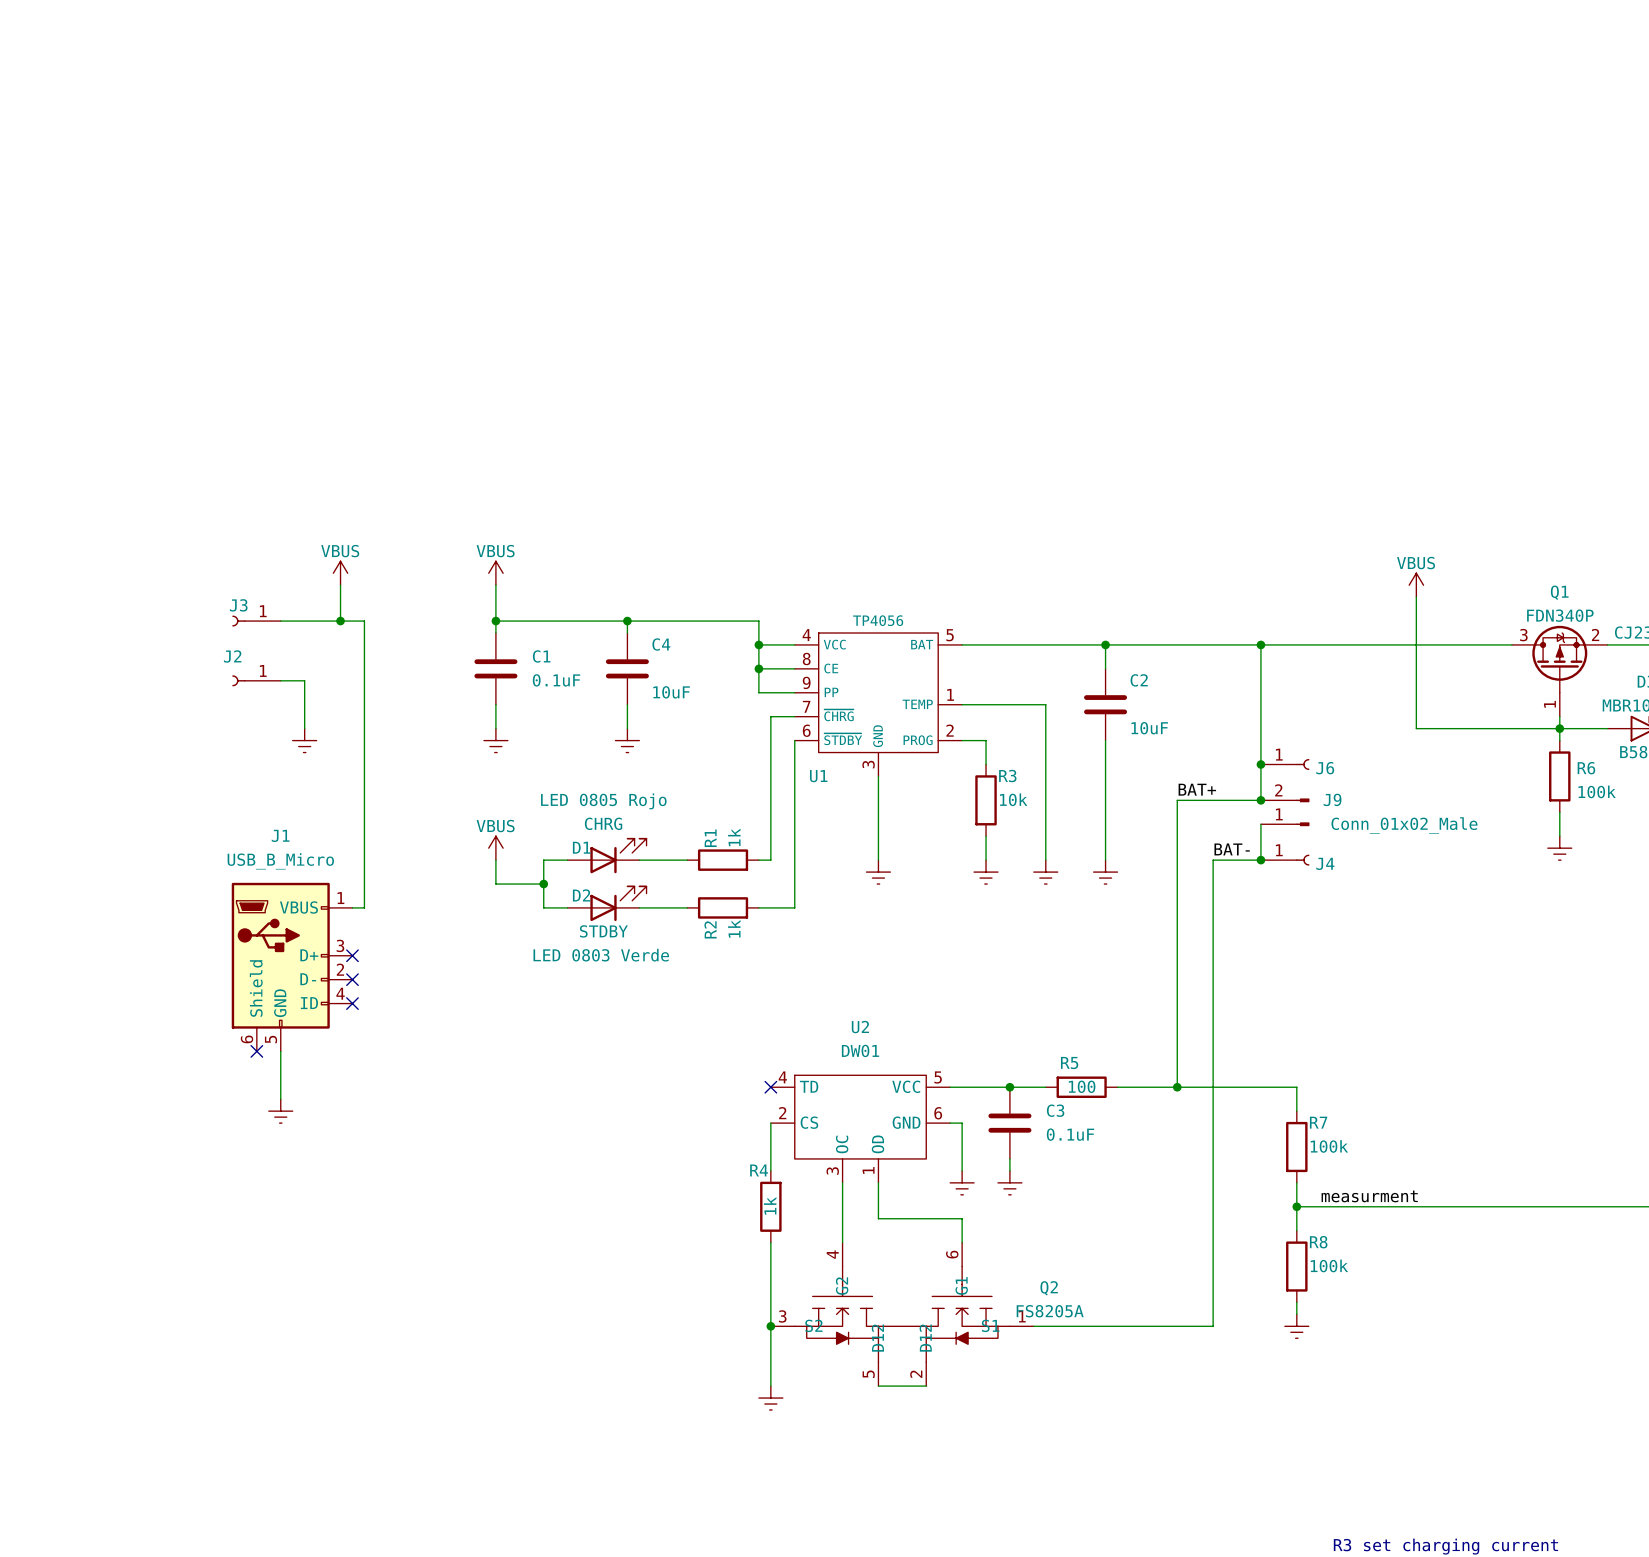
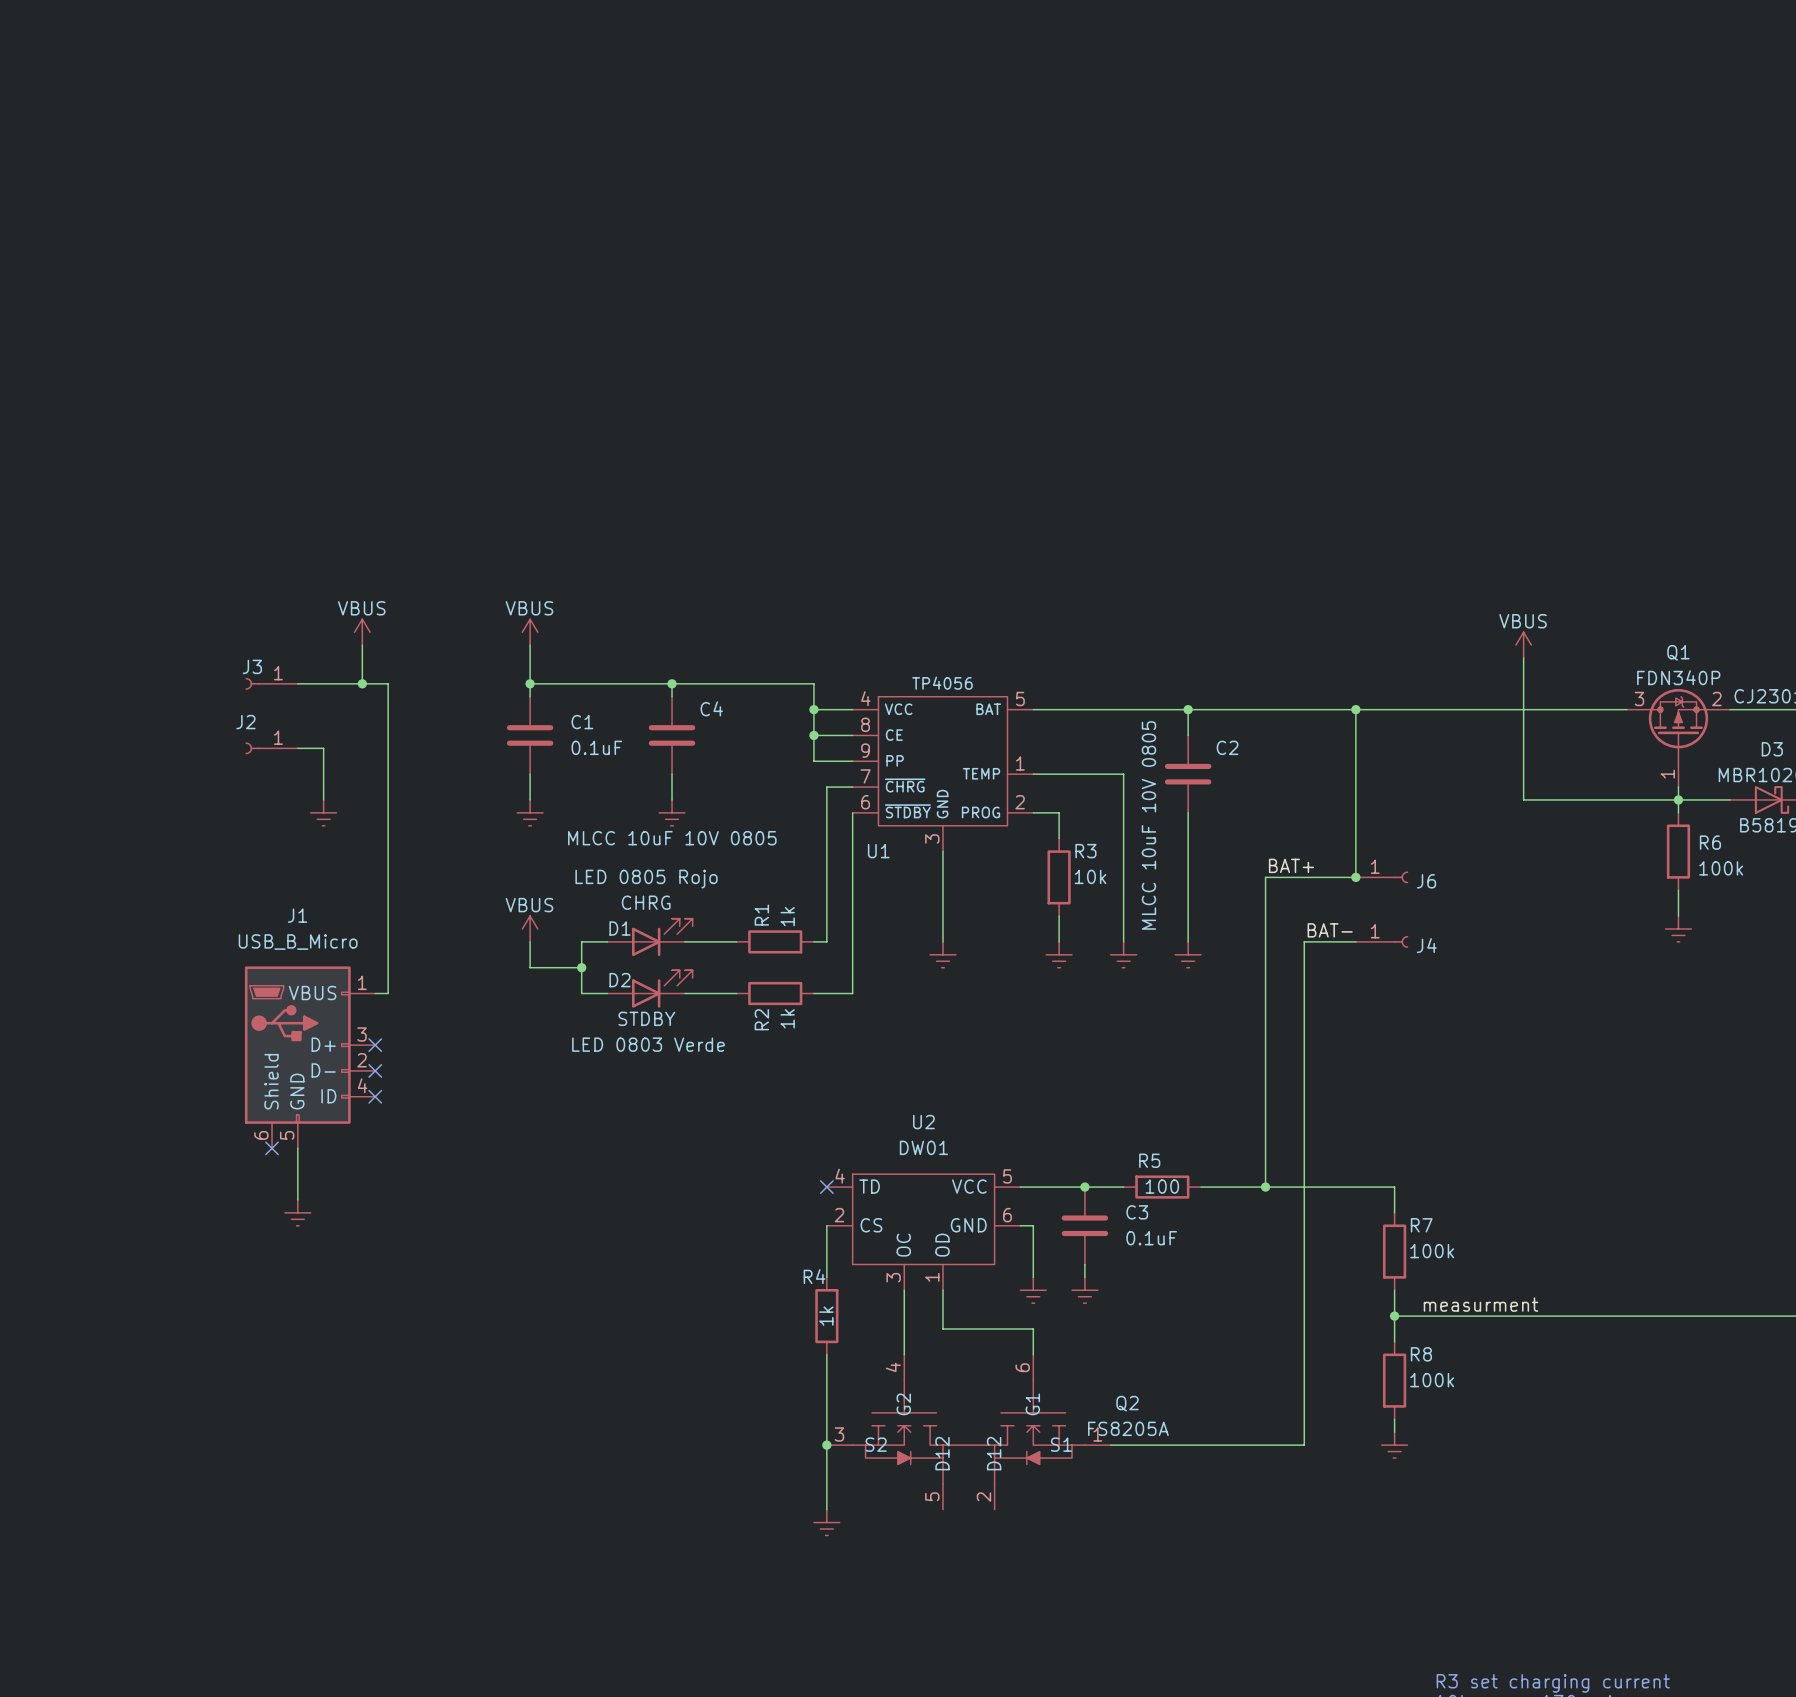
C4 value: 10uF (671, 692) -> MLCC 10uF 10V 0805 (672, 838)
C2 value: 10uF (1149, 728) -> MLCC 10uF 10V 0805 (1148, 825)
junction: (1260, 764) -> none
J6 position: (1285, 764) -> (1382, 877)
J9: Conn_01x02_Male (1285, 812) -> none
wire: (1260, 824) (1260, 860) -> none
junction: (1260, 860) -> none
wire: (878, 1386) (926, 1386) -> none

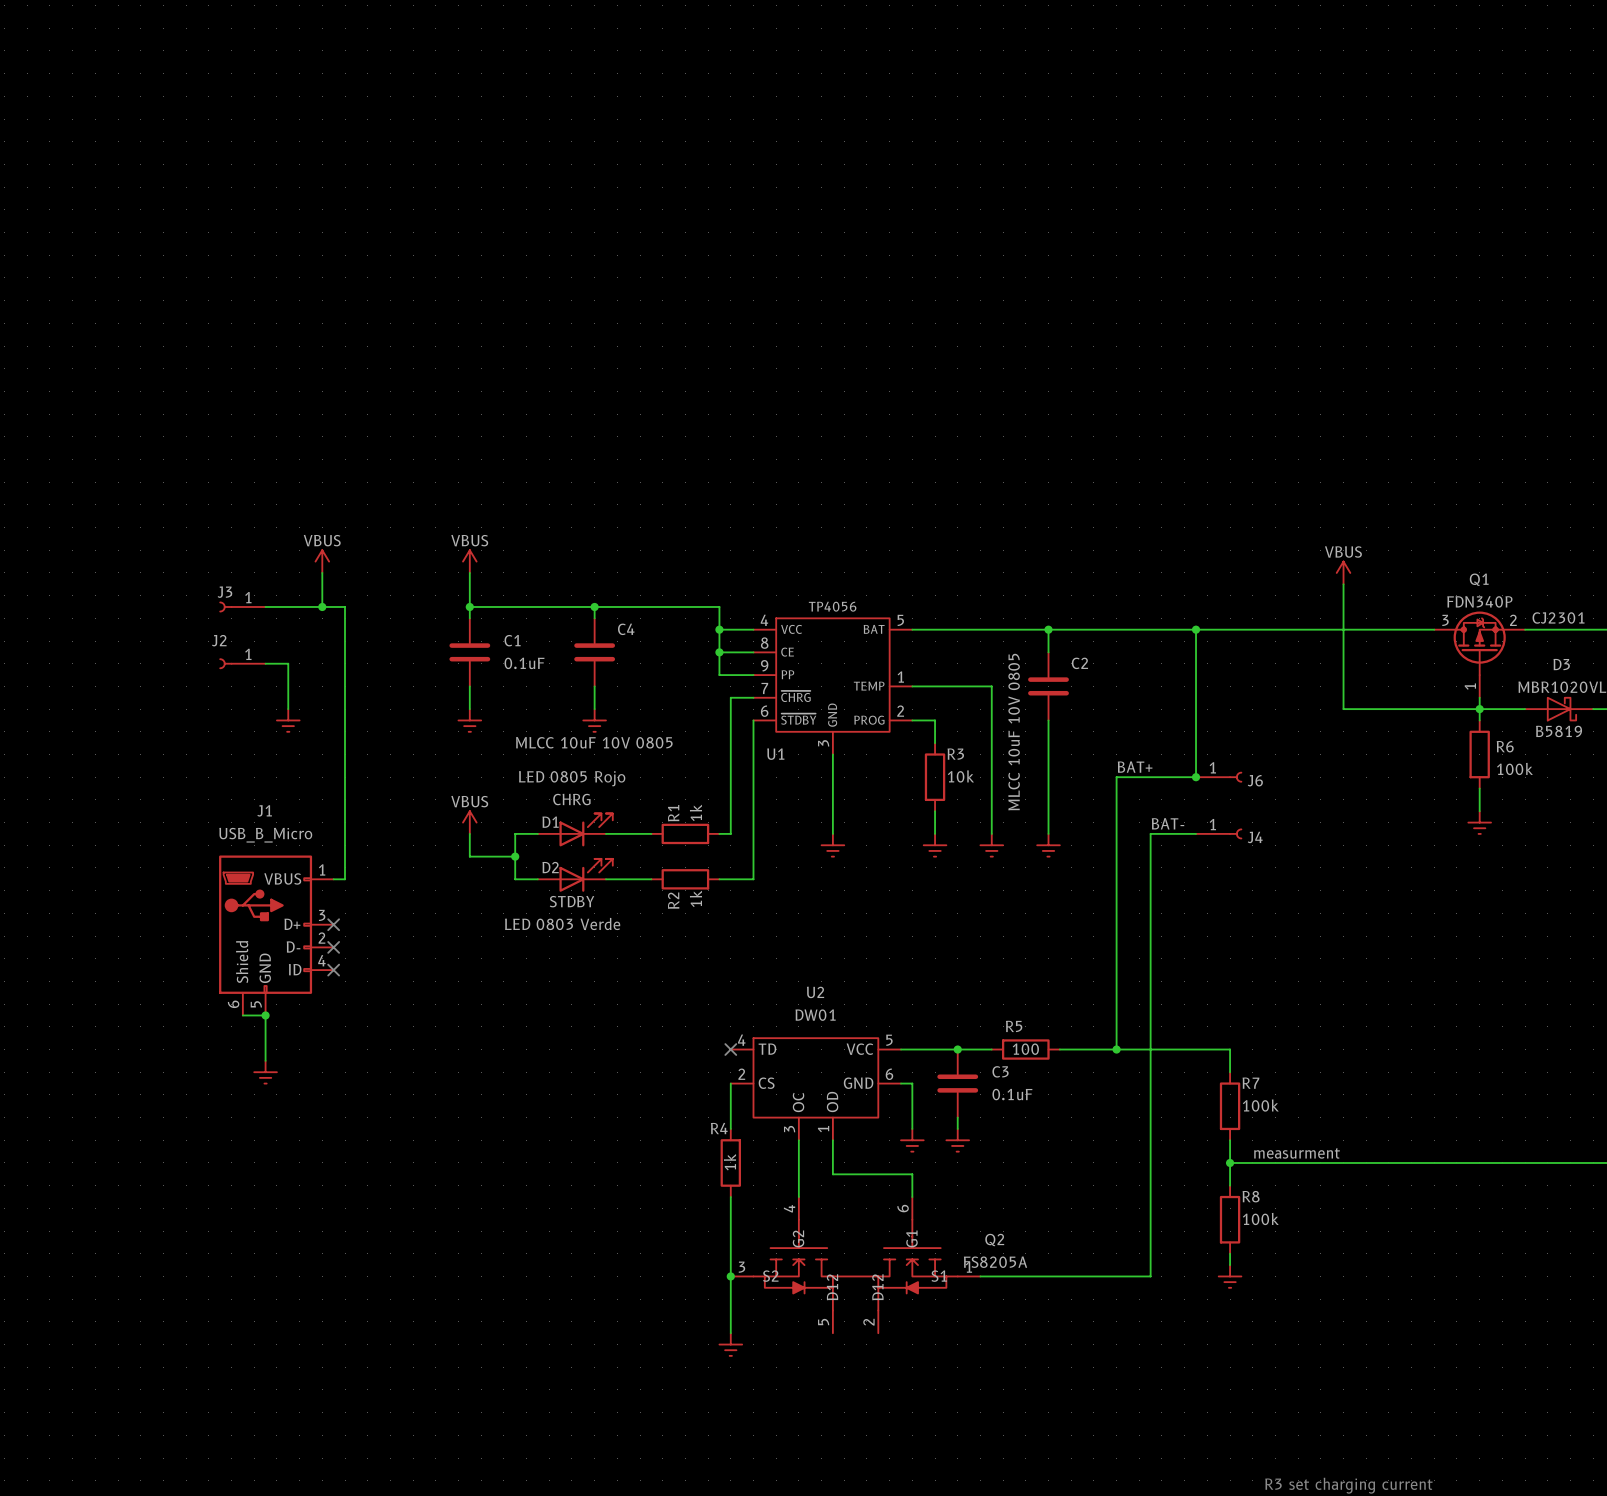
wire: none -> (242, 1015) (265, 1015)
no-connect mark: (272, 1148) -> none
junction: none -> (265, 1015)

